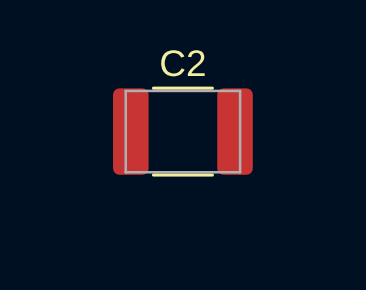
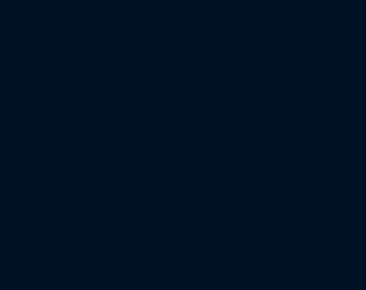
C2: (182, 131) -> none

